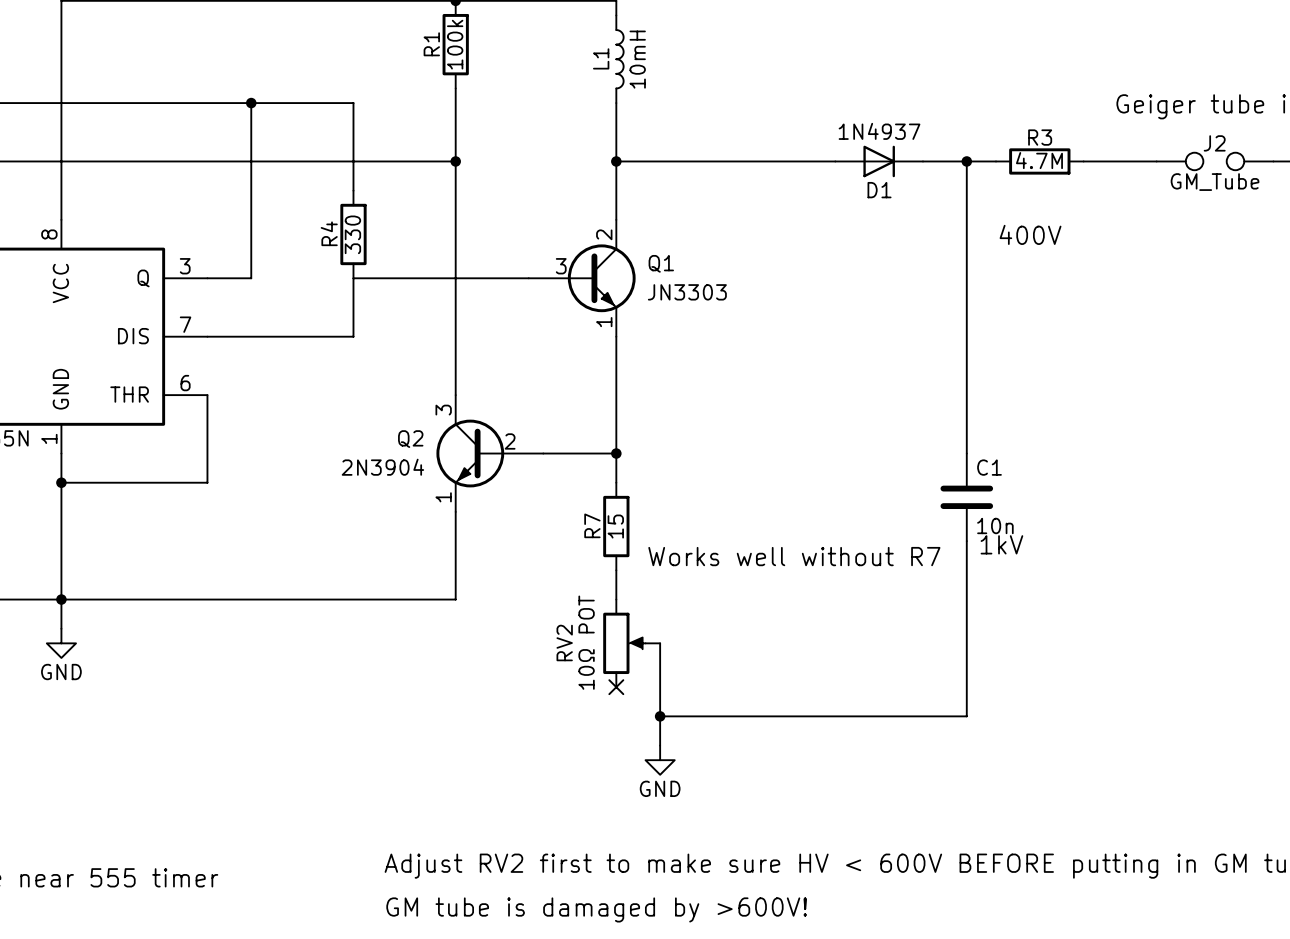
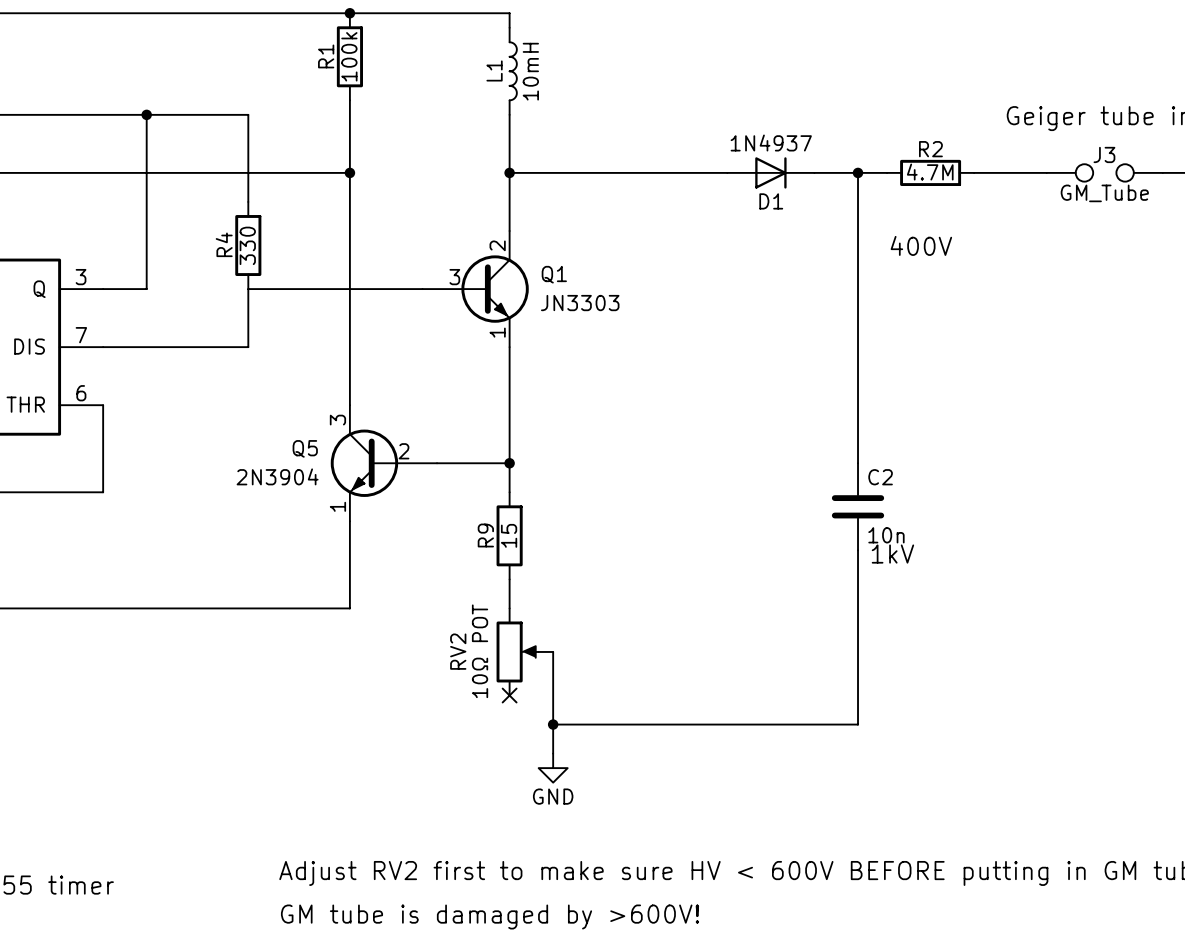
R3 name: R3 (1040, 137) -> R2 (930, 149)
J2 name: J2 (1214, 143) -> J3 (1104, 154)
Q2 name: Q2 (410, 439) -> Q5 (305, 448)
C1 name: C1 (989, 467) -> C2 (880, 477)
R7 name: R7 (592, 525) -> R9 (485, 535)
text: Works well without R7 (794, 556) -> none

